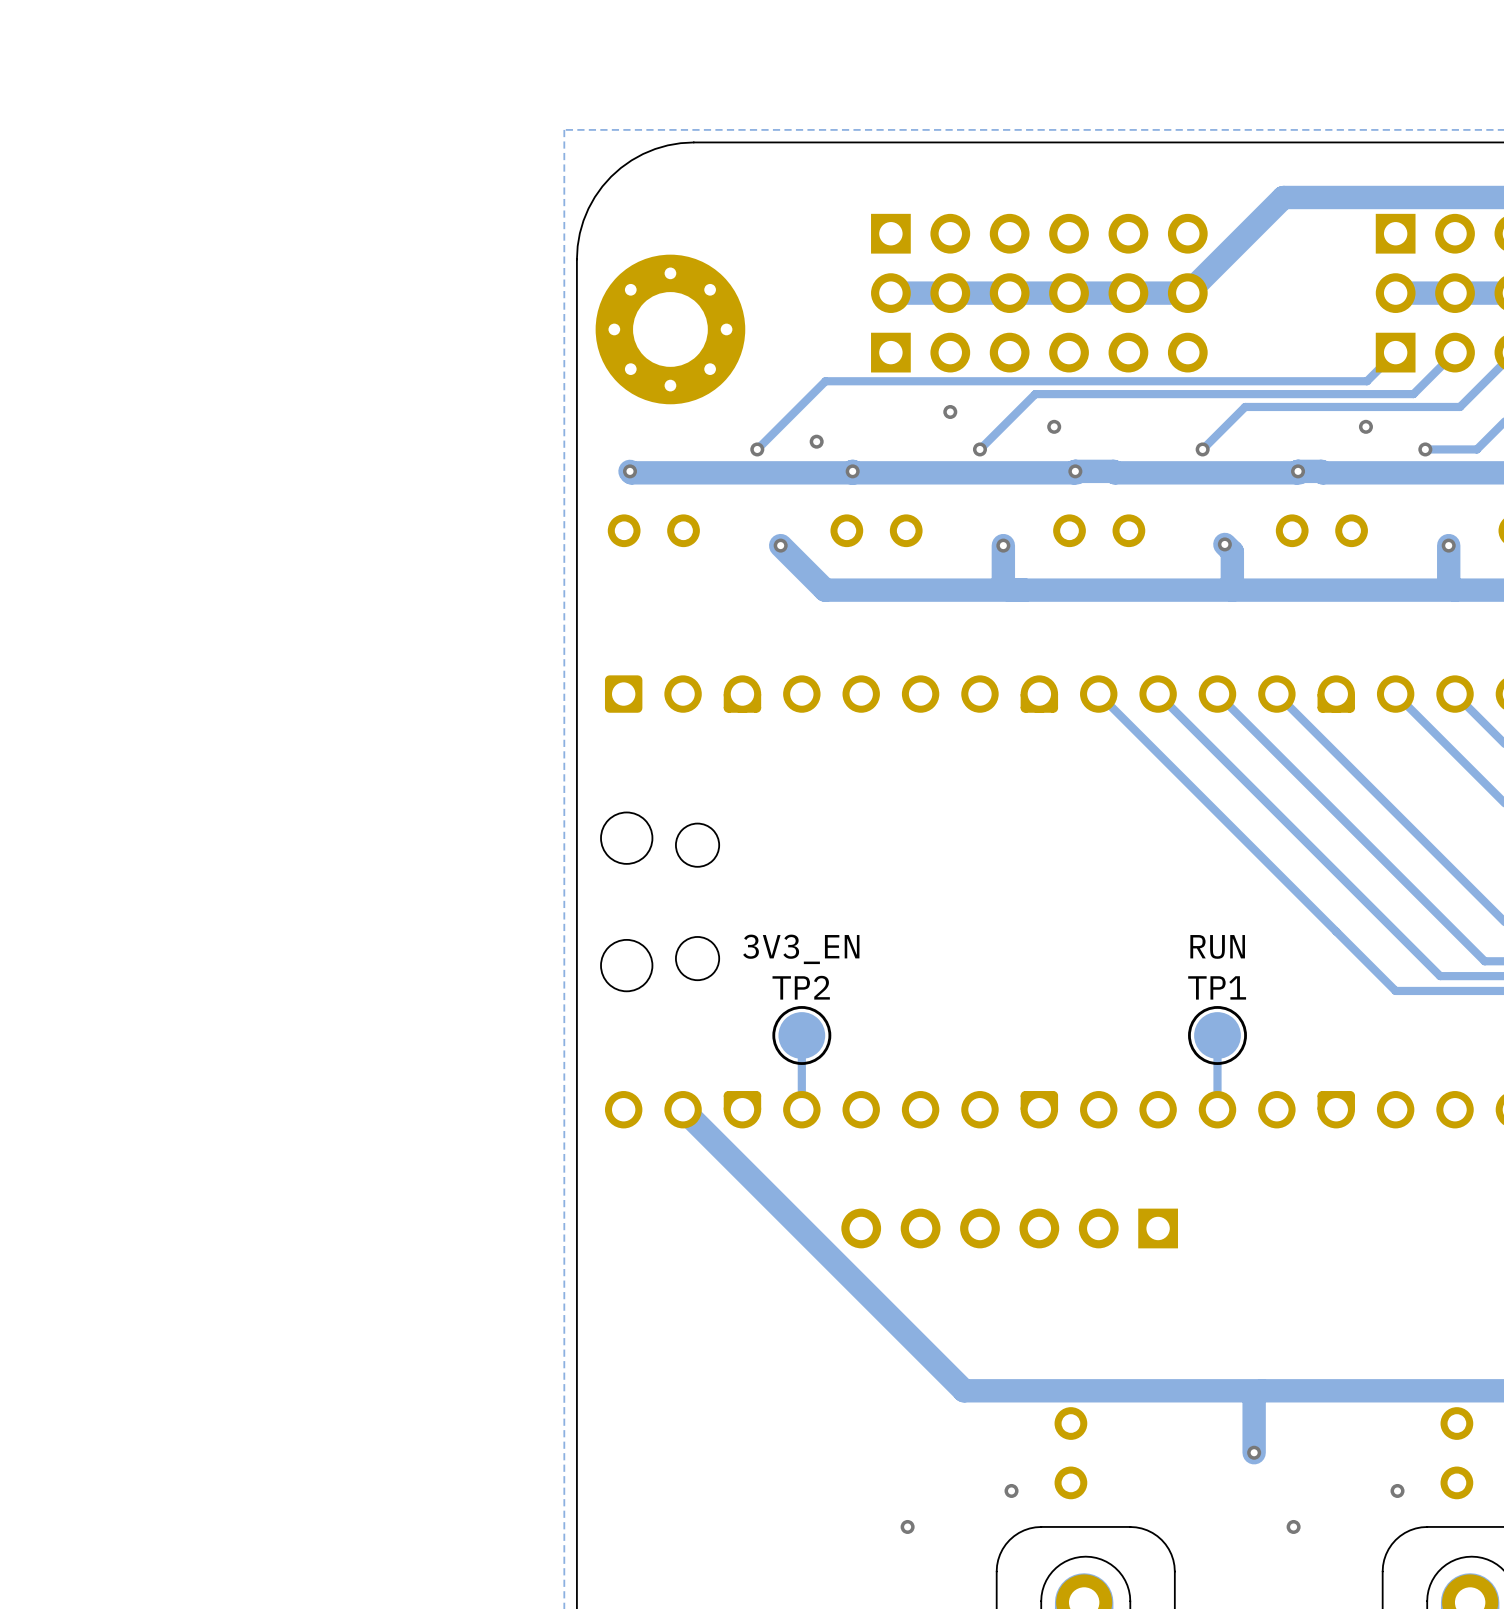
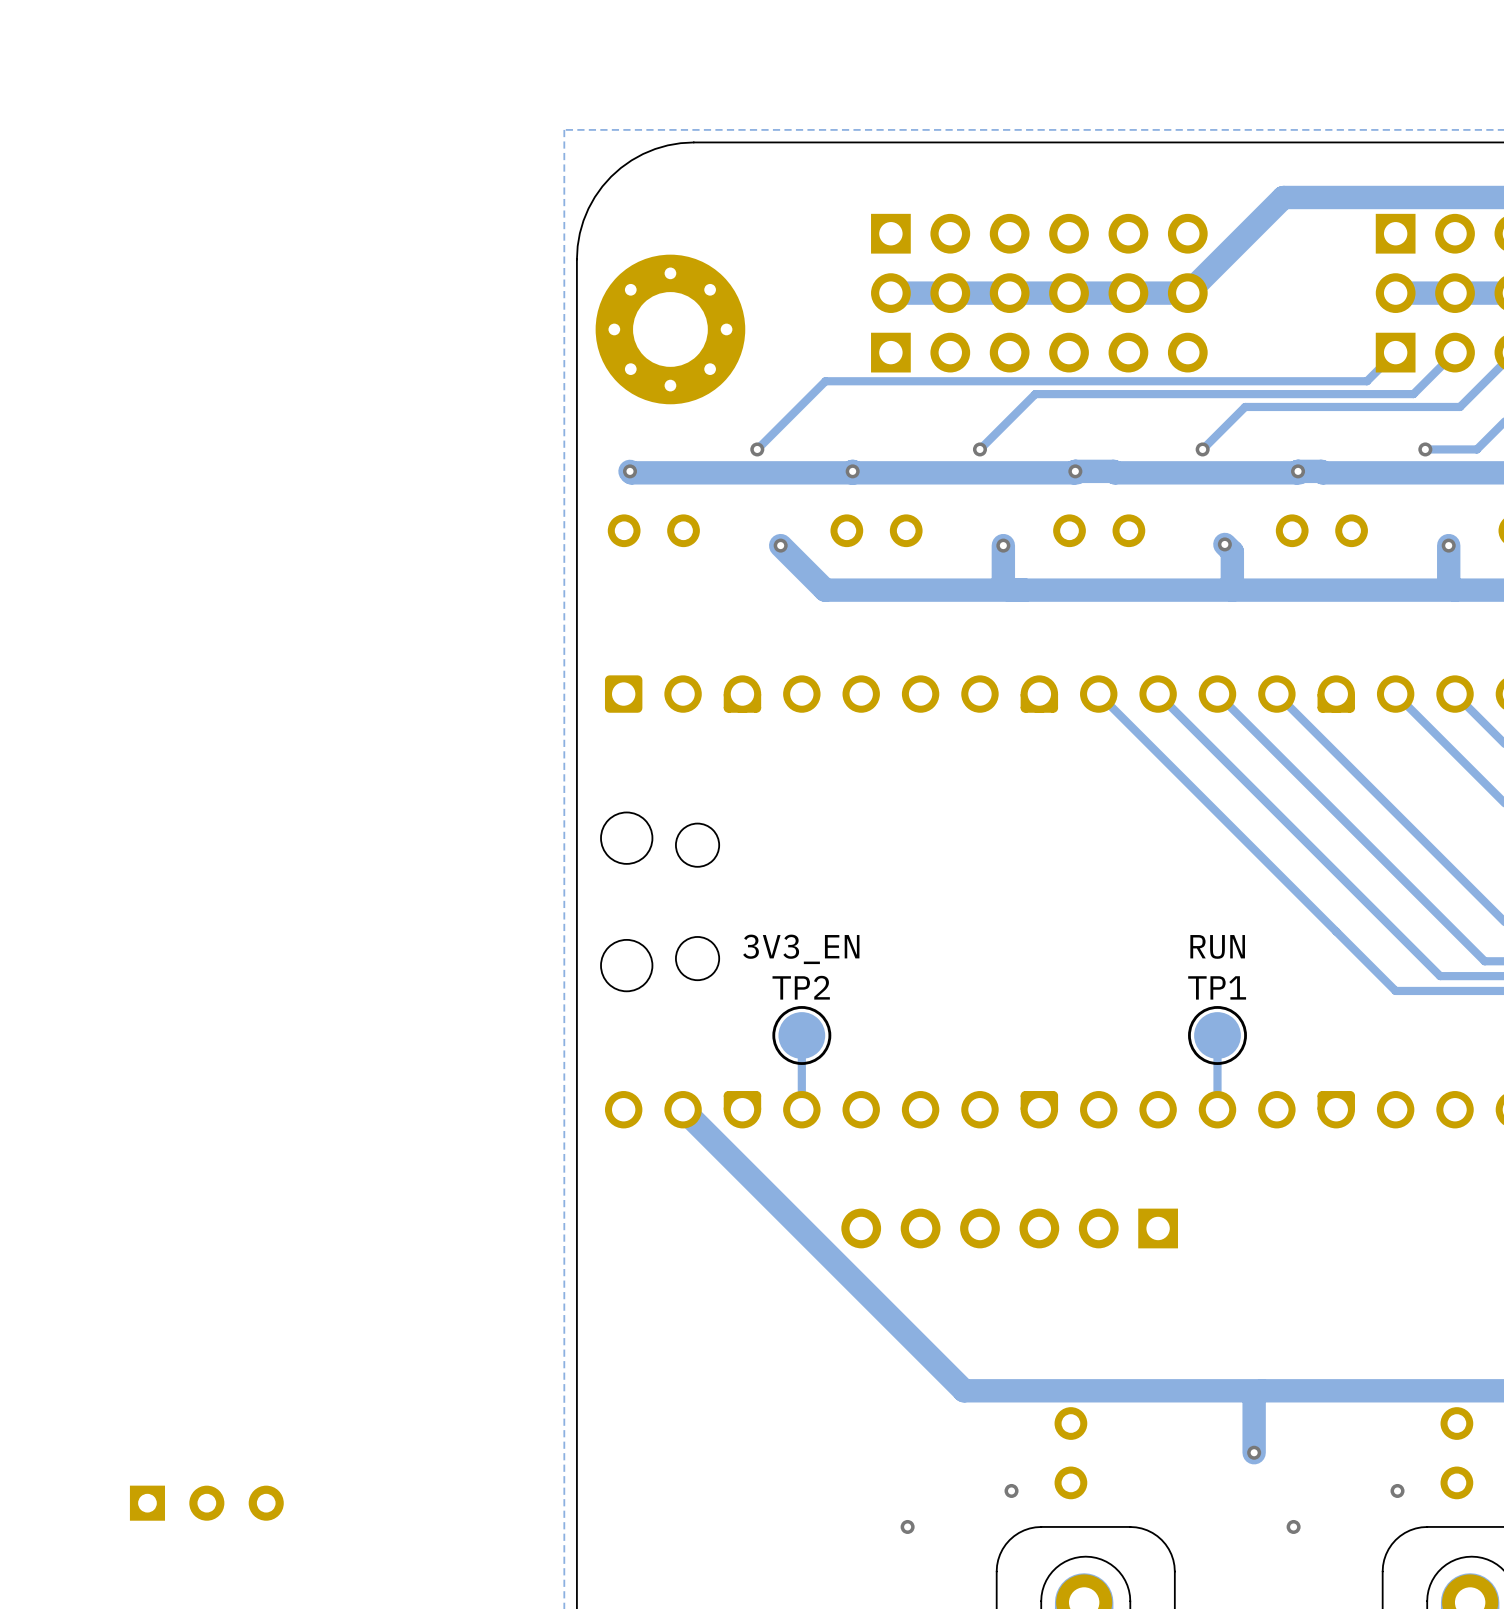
via: (950, 411) -> none
via: (1054, 426) -> none
via: (1365, 426) -> none
via: (816, 441) -> none
part: none -> (206, 1503)

